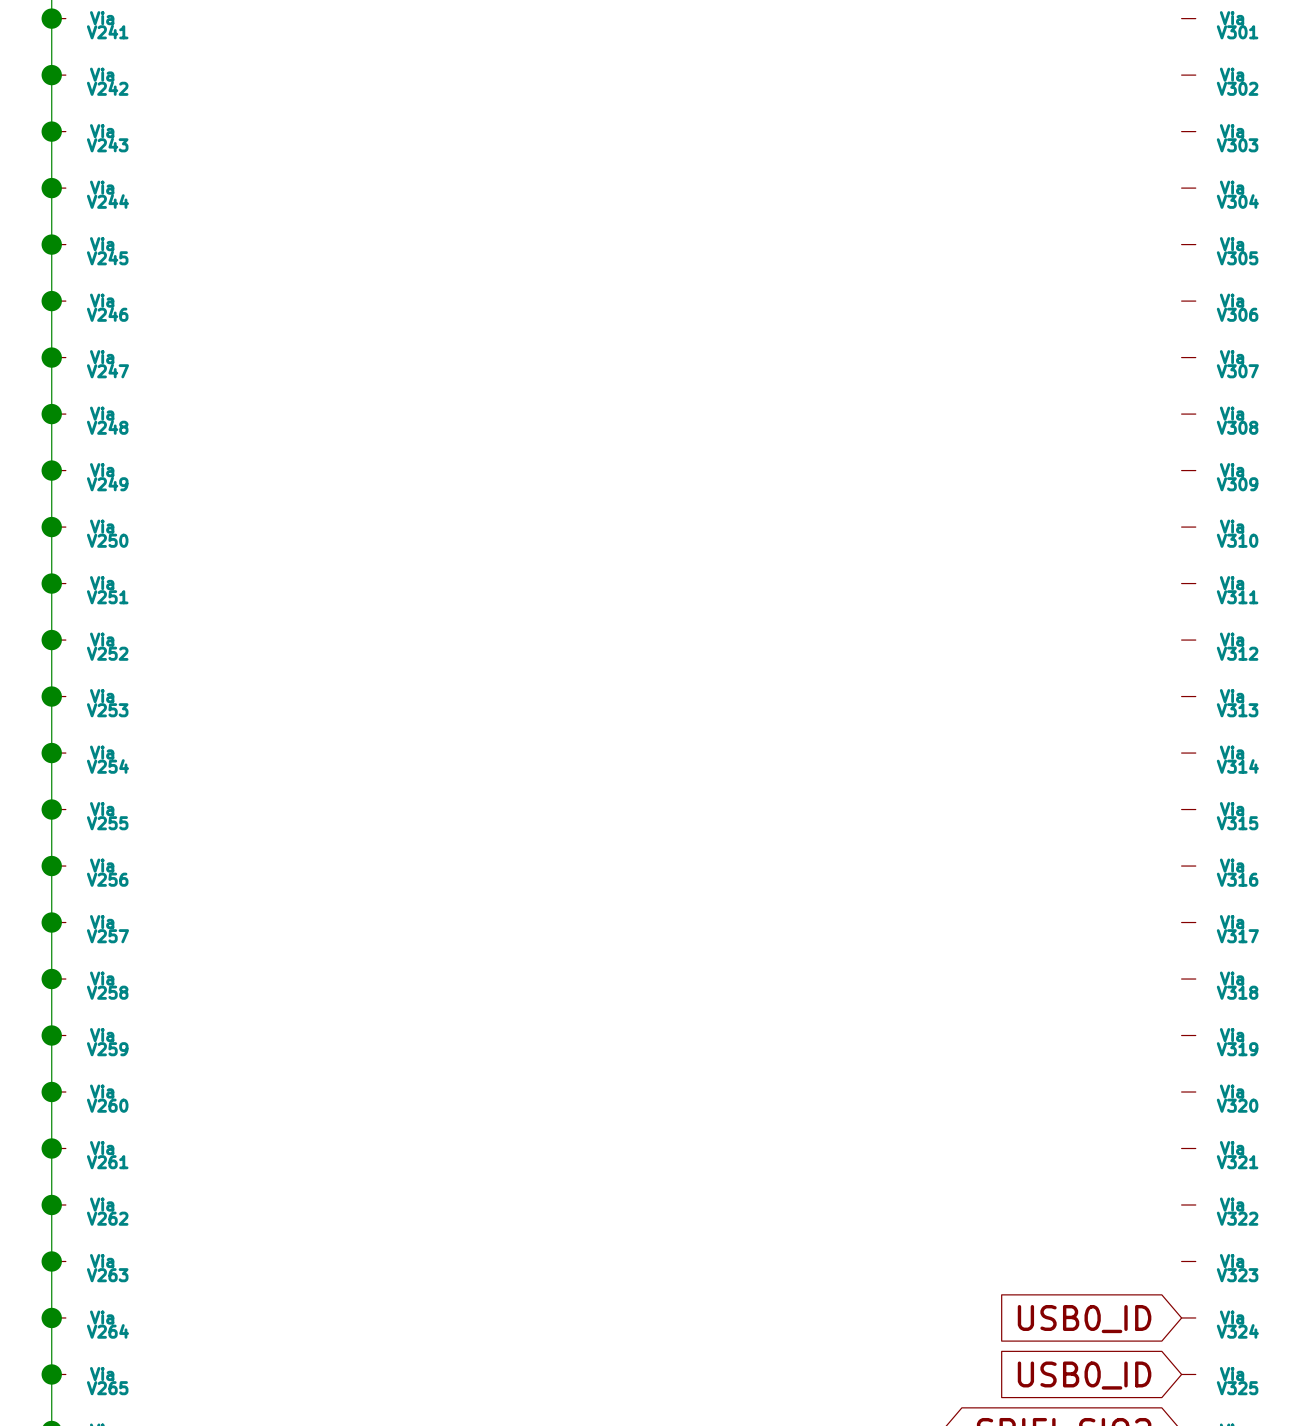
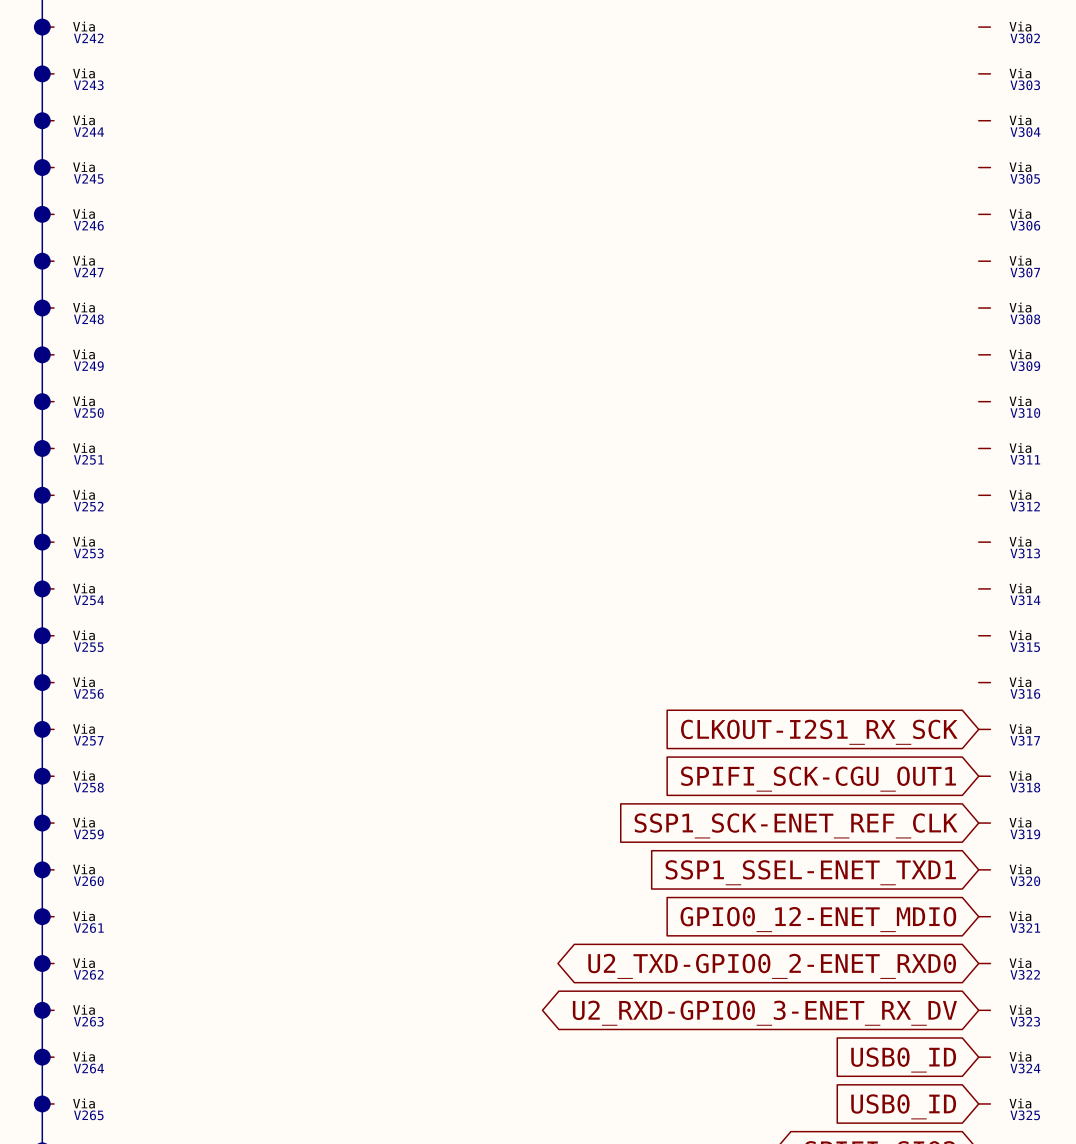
global label: none -> CLKOUT-I2S1_RX_SCK (819, 732)
global label: none -> SPIFI_SCK-CGU_OUT1 (818, 779)
global label: none -> SSP1_SCK-ENET_REF_CLK (796, 825)
global label: none -> SSP1_SSEL-ENET_TXD1 (810, 872)
global label: none -> GPIO0_12-ENET_MDIO (818, 919)
global label: none -> U2_TXD-GPIO0_2-ENET_RXD0 (772, 966)
global label: none -> U2_RXD-GPIO0_3-ENET_RX_DV (764, 1013)

